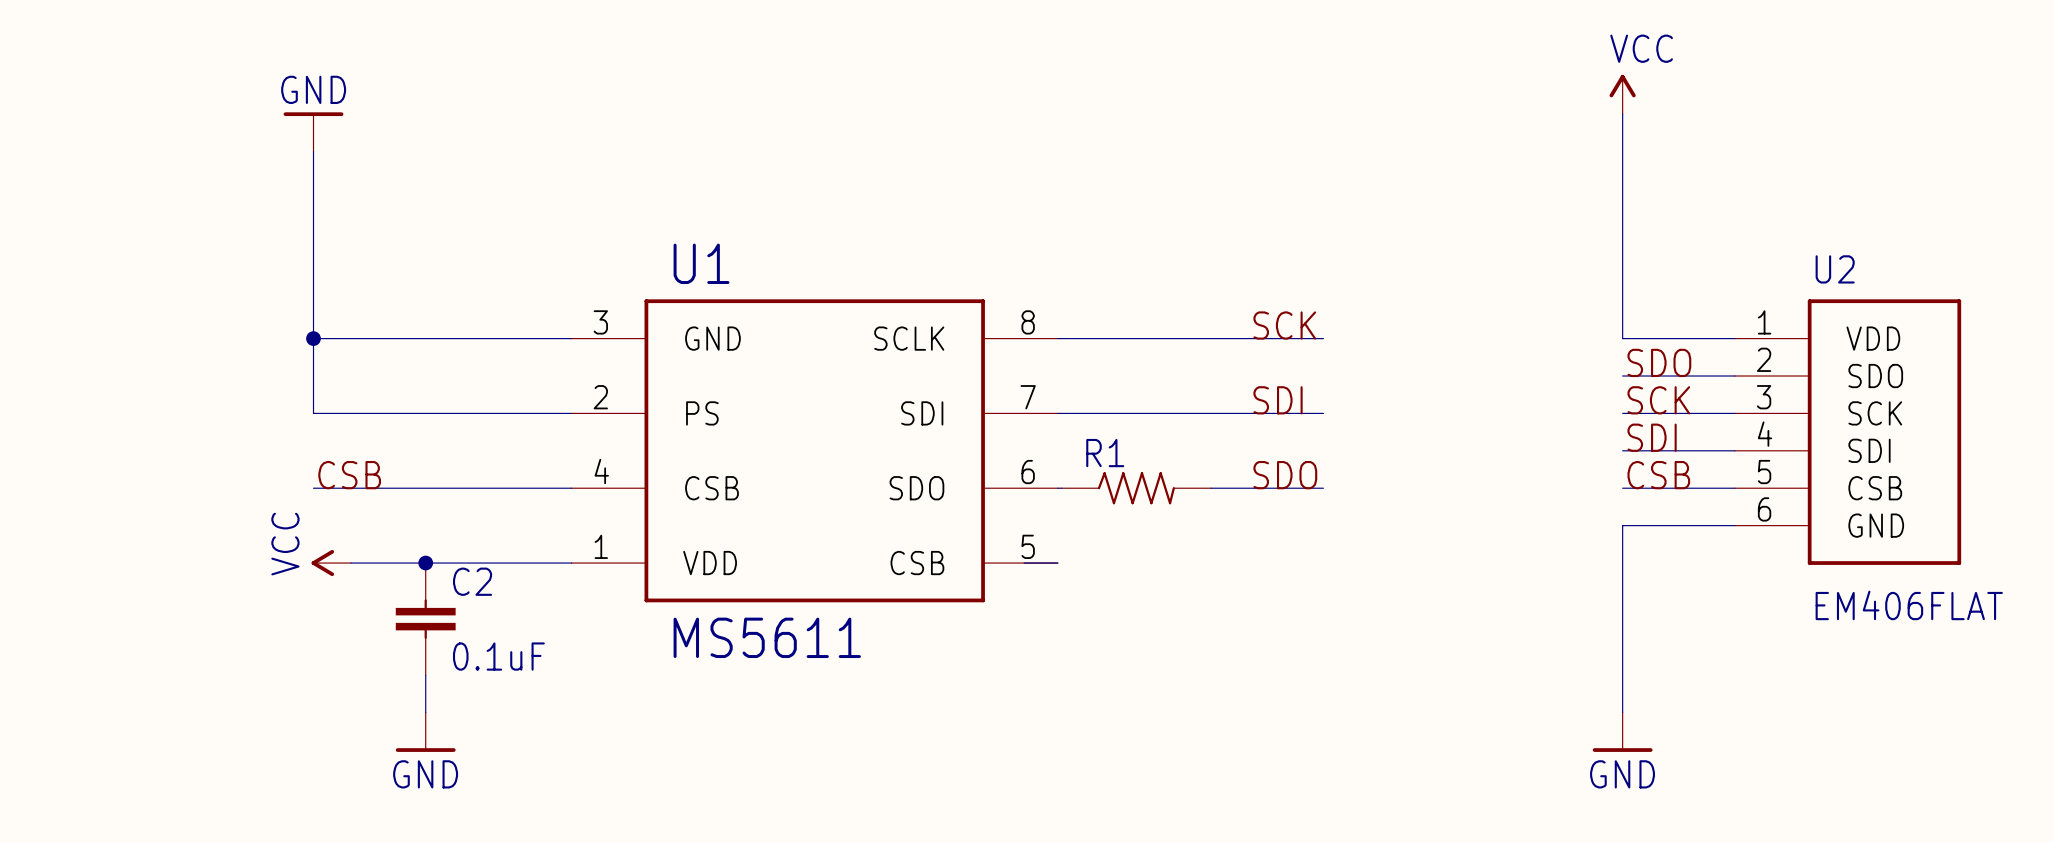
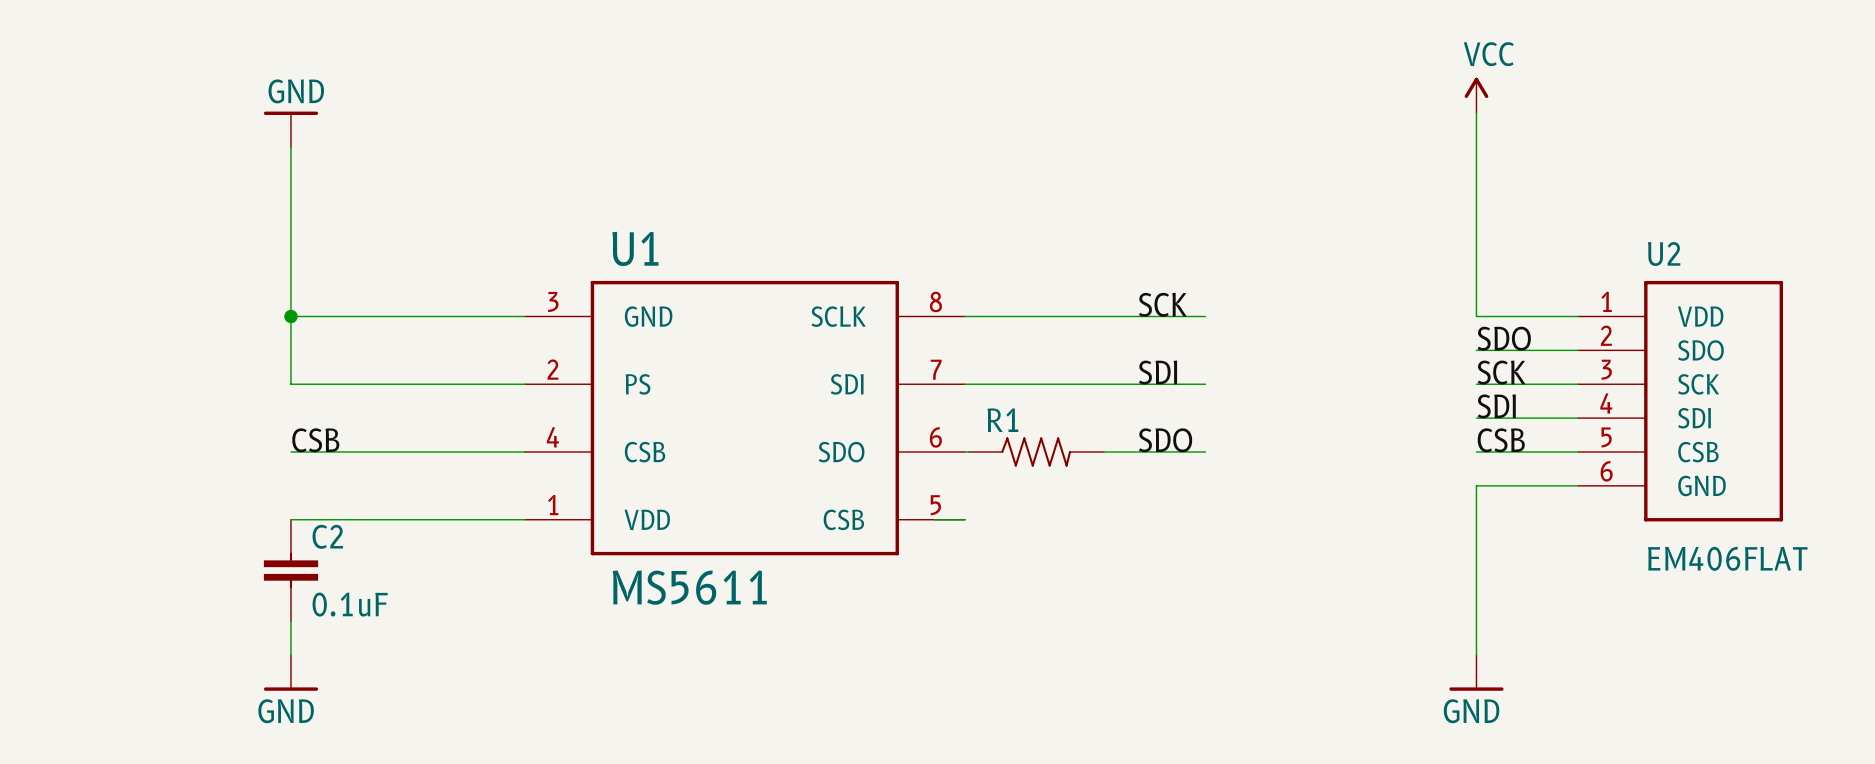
power symbol: VCC (331, 563) -> none
junction: (425, 563) -> none
C2 position: (425, 619) -> (290, 570)
wire: (425, 675) (425, 712) -> (290, 621) (290, 655)
power symbol position: GND (425, 732) -> GND (290, 672)

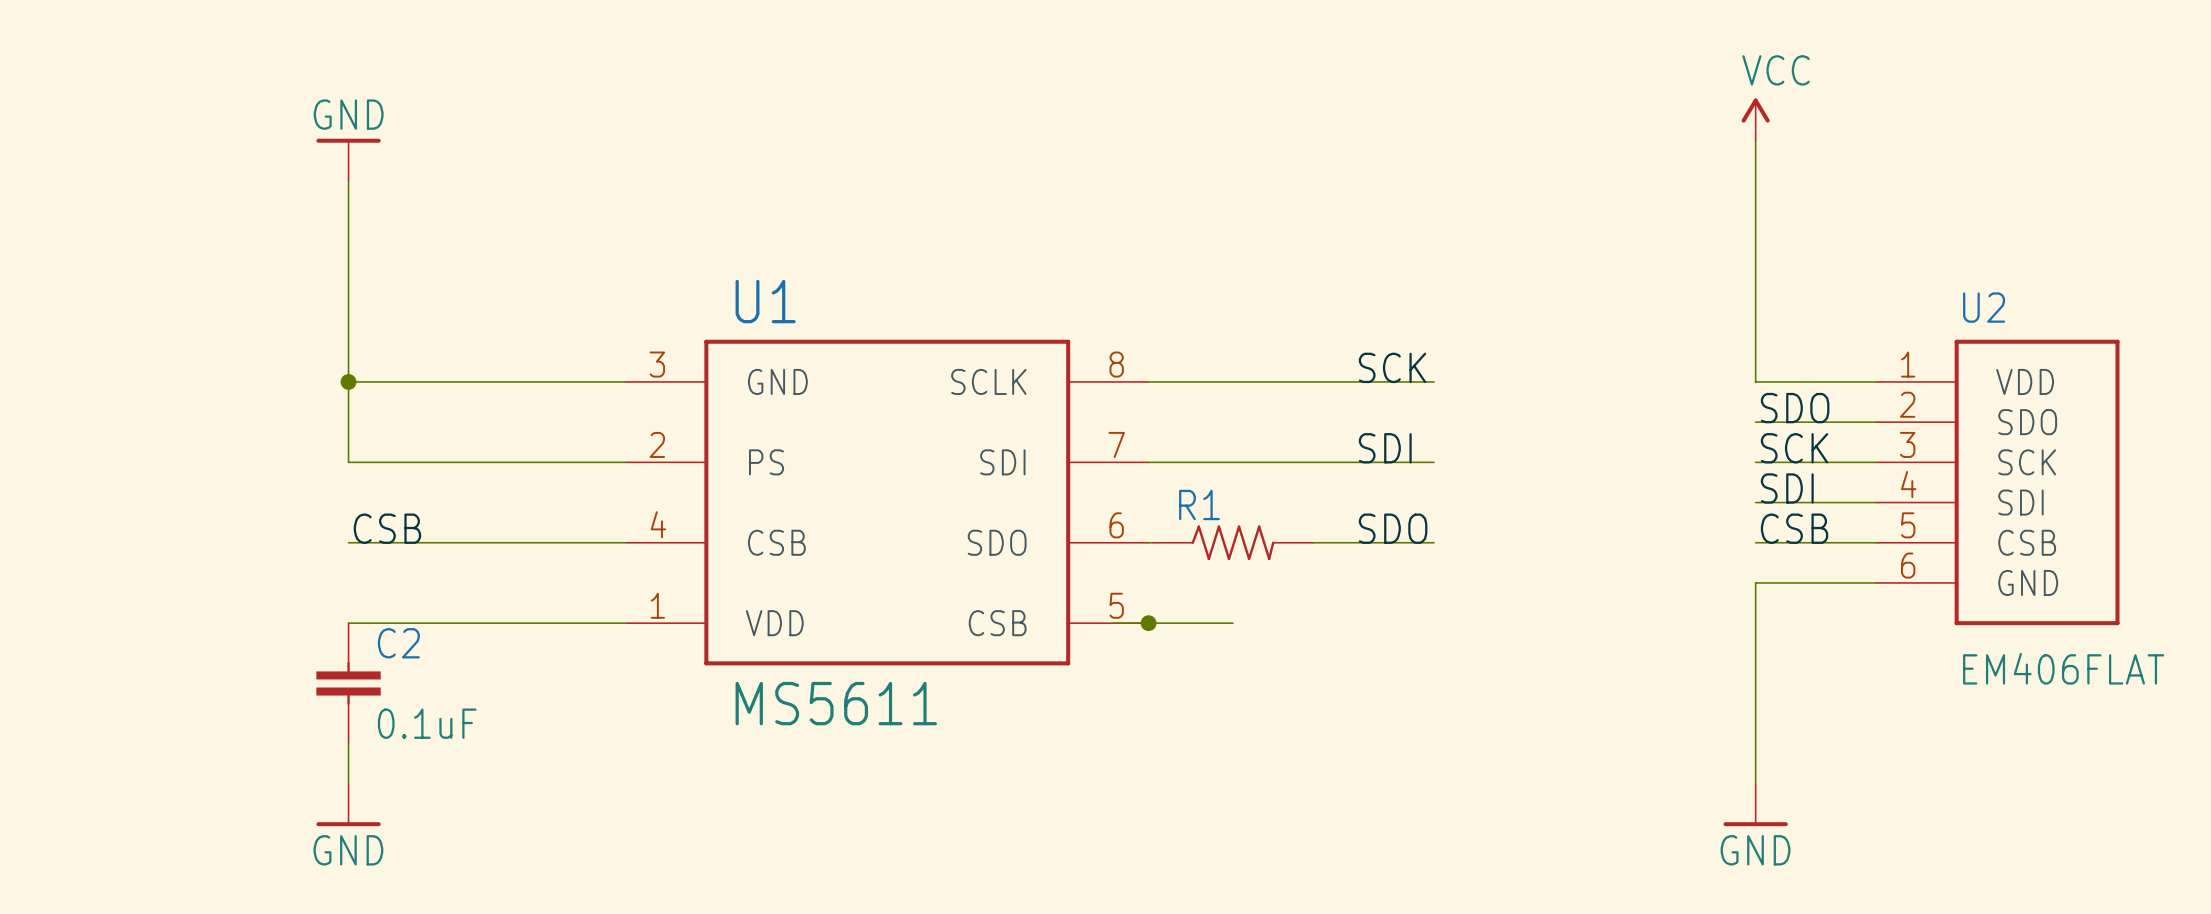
wire: none -> (1148, 623) (1233, 623)
junction: none -> (1148, 623)

